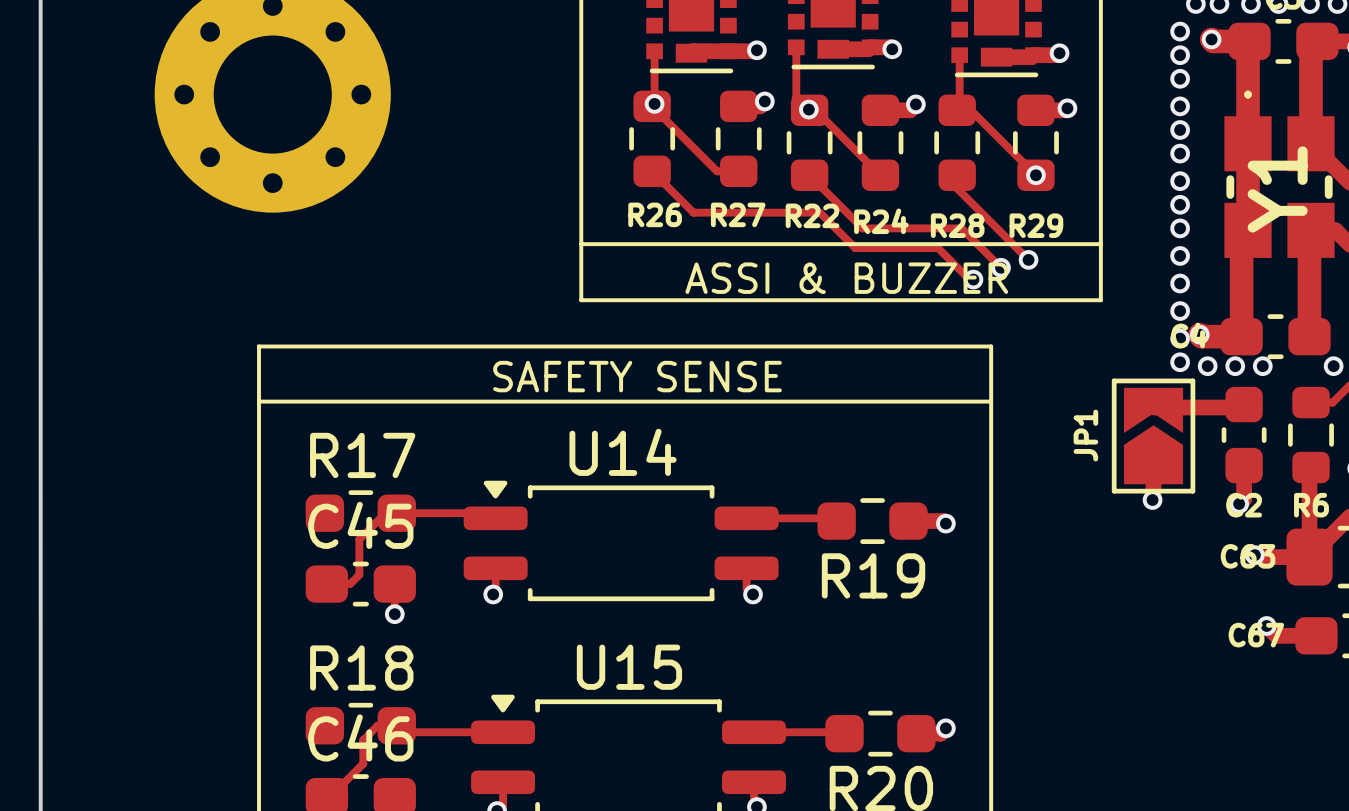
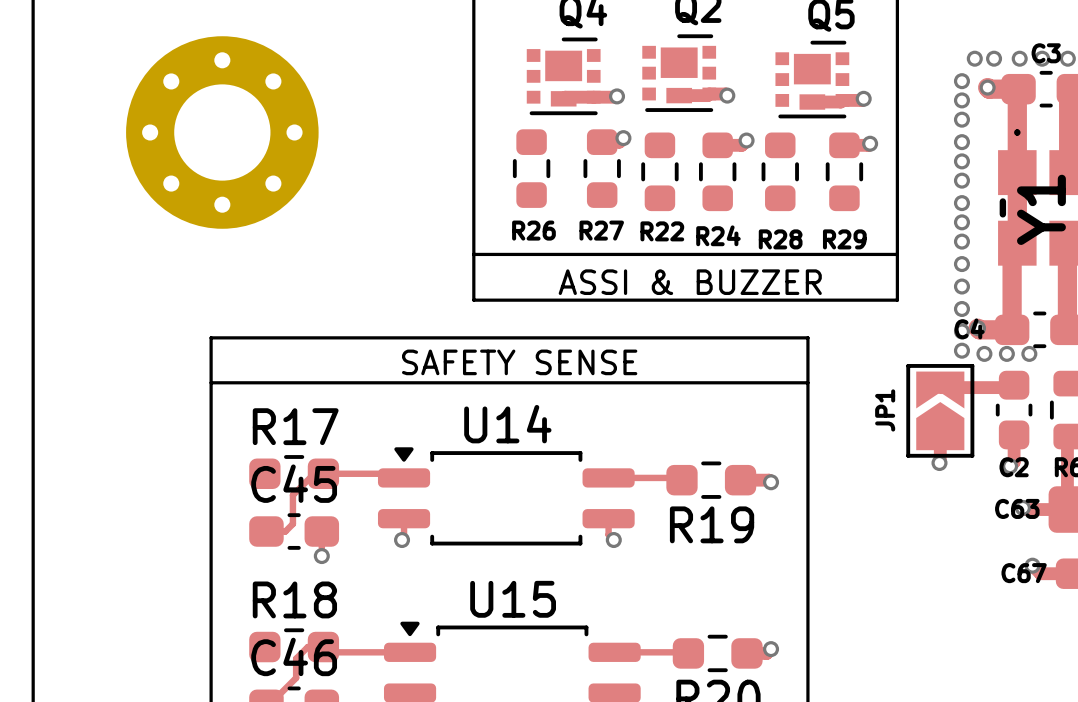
track: (796, 47) (796, 97) (809, 110) (815, 110) (880, 175) -> none
track: (654, 51) (654, 103) (652, 106) (717, 171) (738, 171) -> none
track: (959, 55) (959, 107) (957, 110) (970, 110) (1035, 175) -> none
via: (654, 103) -> none
via: (808, 109) -> none
track: (652, 171) (693, 212) (819, 212) (855, 248) (938, 248) (969, 279) (973, 279) -> none
track: (809, 175) (862, 228) (961, 228) (1001, 267) -> none
track: (957, 175) (957, 188) (1028, 259) -> none
via: (1035, 175) -> none
via: (1028, 259) -> none
via: (1001, 267) -> none
via: (973, 279) -> none

